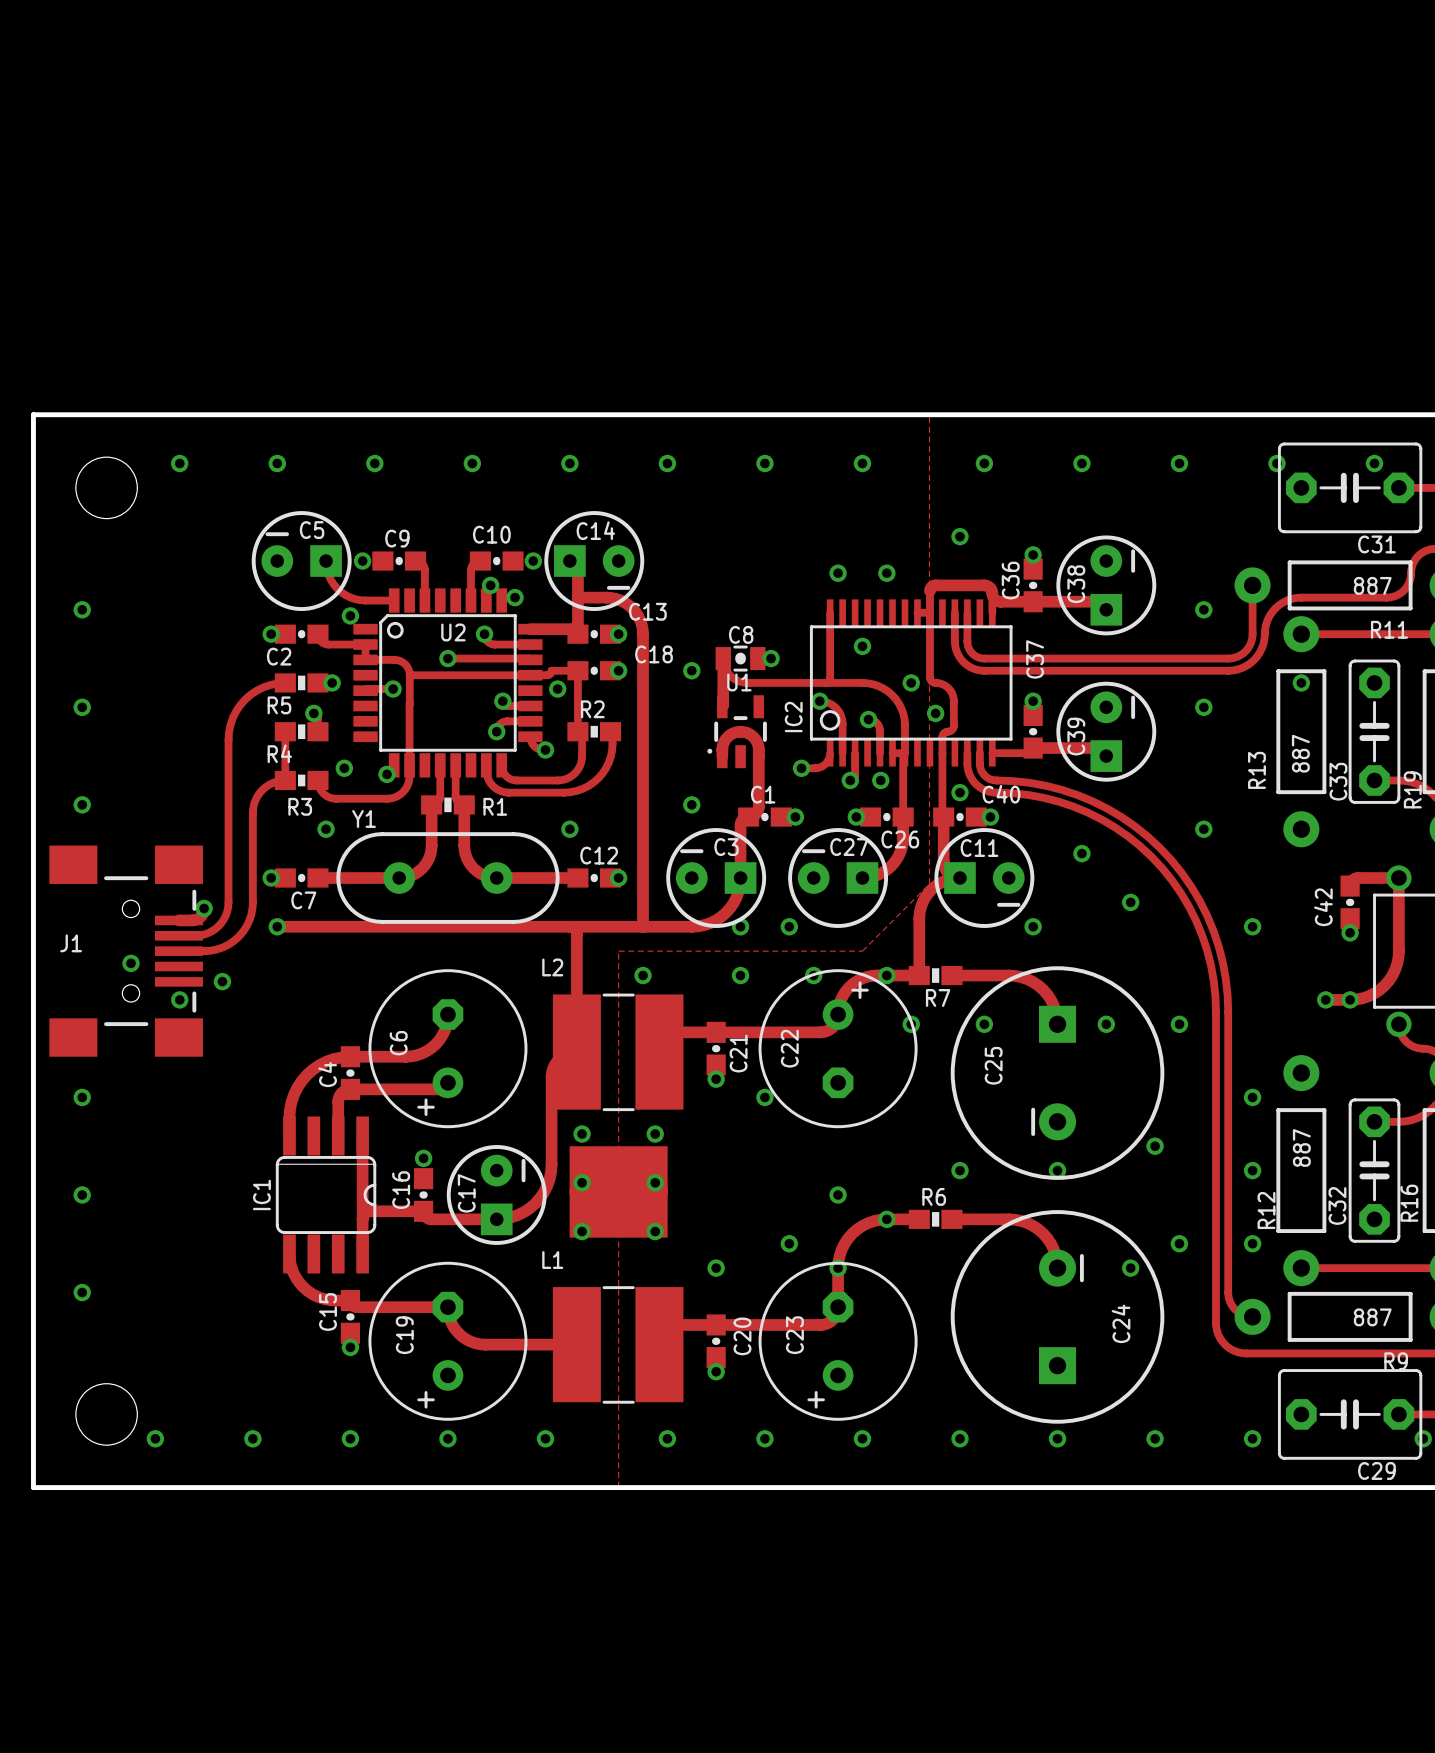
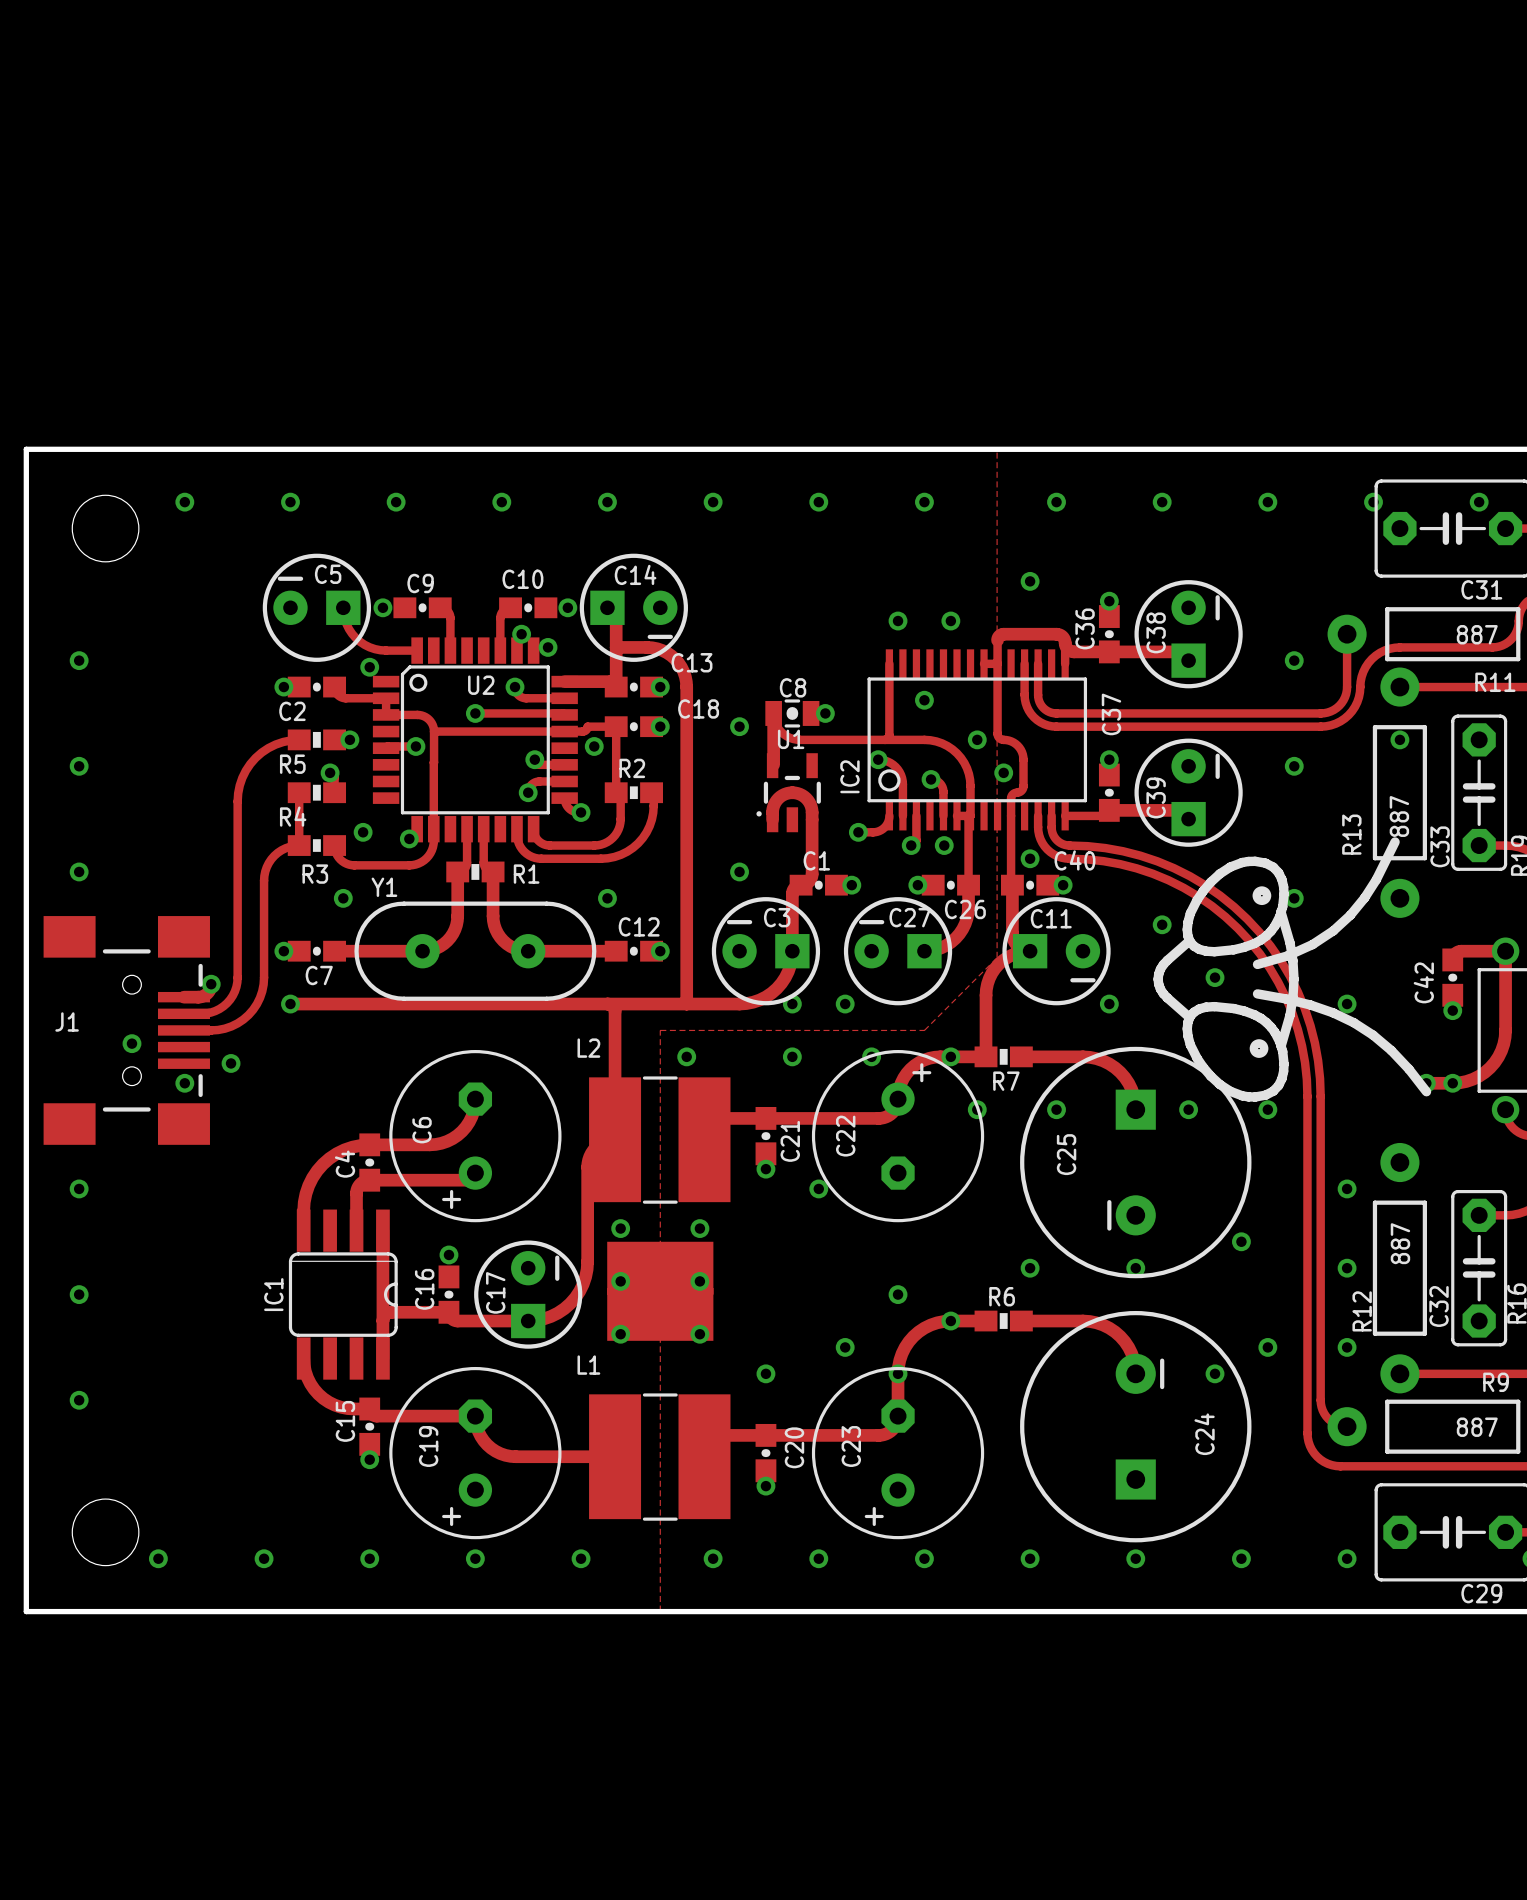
drawing: none -> [1153, 837, 1432, 1102]
R9 name position: R9 (1396, 1361) -> R9 (1496, 1382)

